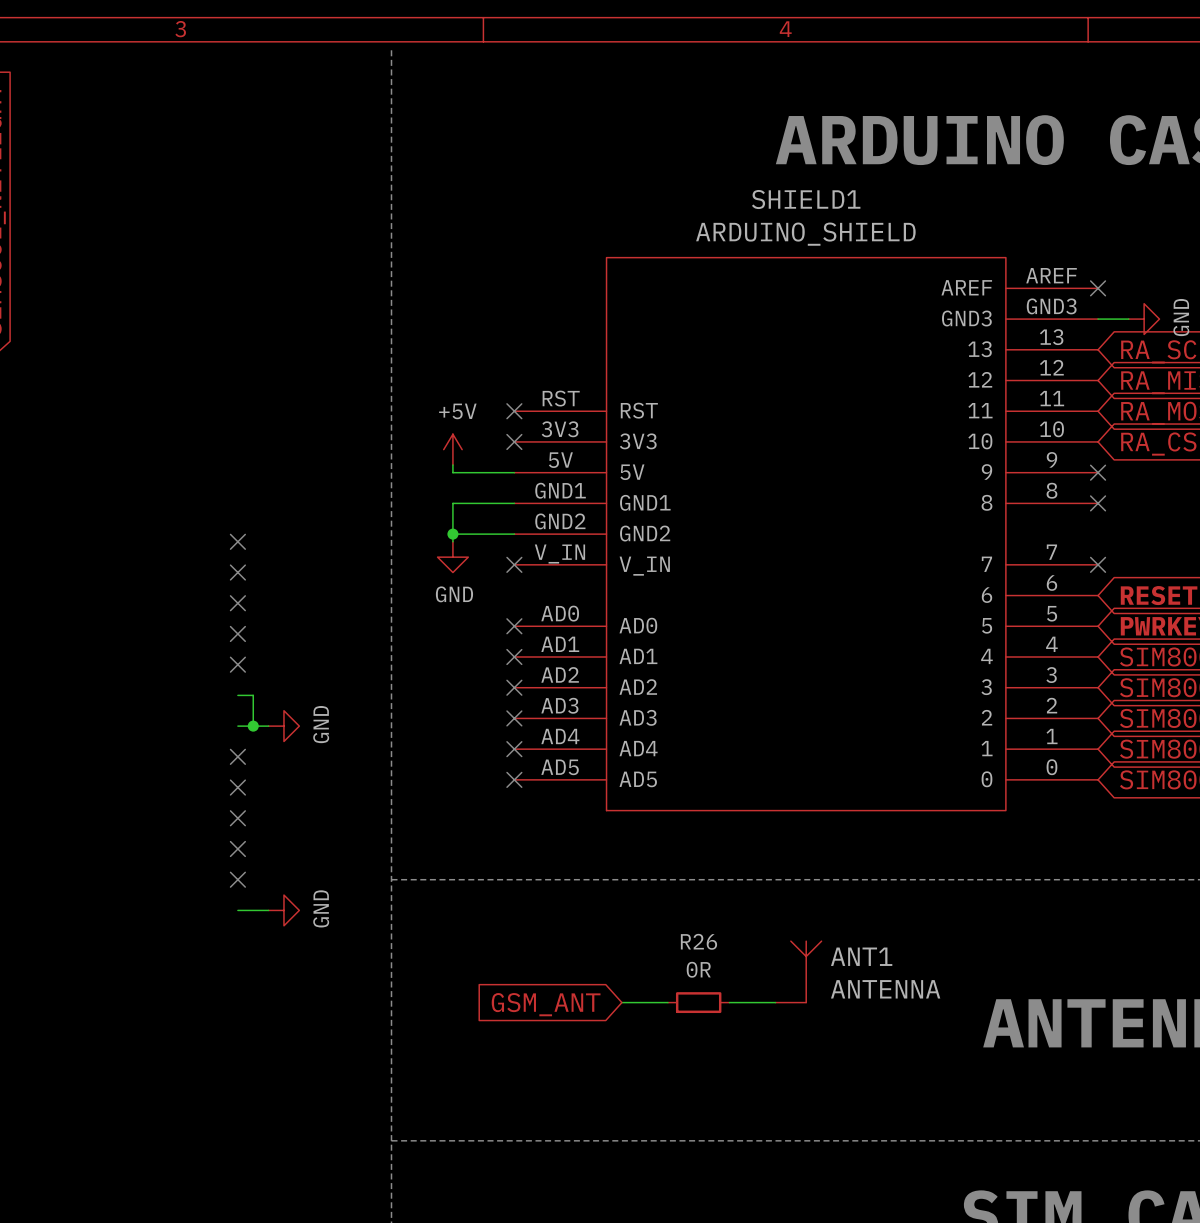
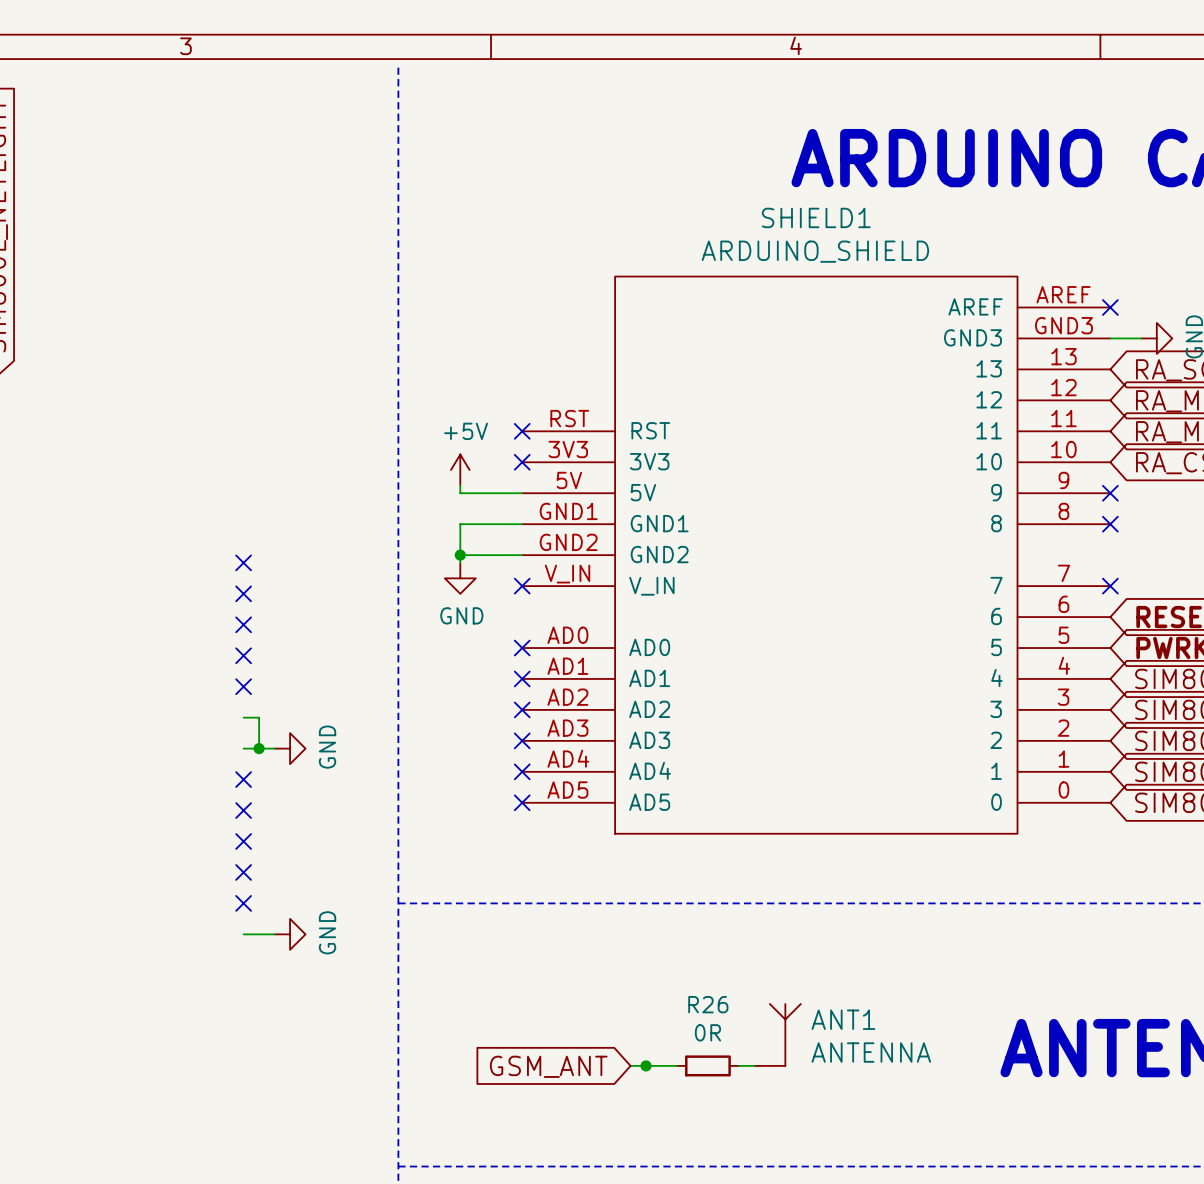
ANT1 position: (798, 971) -> (777, 1034)
wire: (621, 1002) (667, 1002) -> (630, 1065) (676, 1065)
R26 position: (698, 1002) -> (707, 1065)
wire: (729, 1002) (775, 1002) -> none
global label position: GSM_ANT (546, 1004) -> GSM_ANT (548, 1066)
junction: none -> (646, 1065)
wire: none -> (738, 1065) (754, 1065)

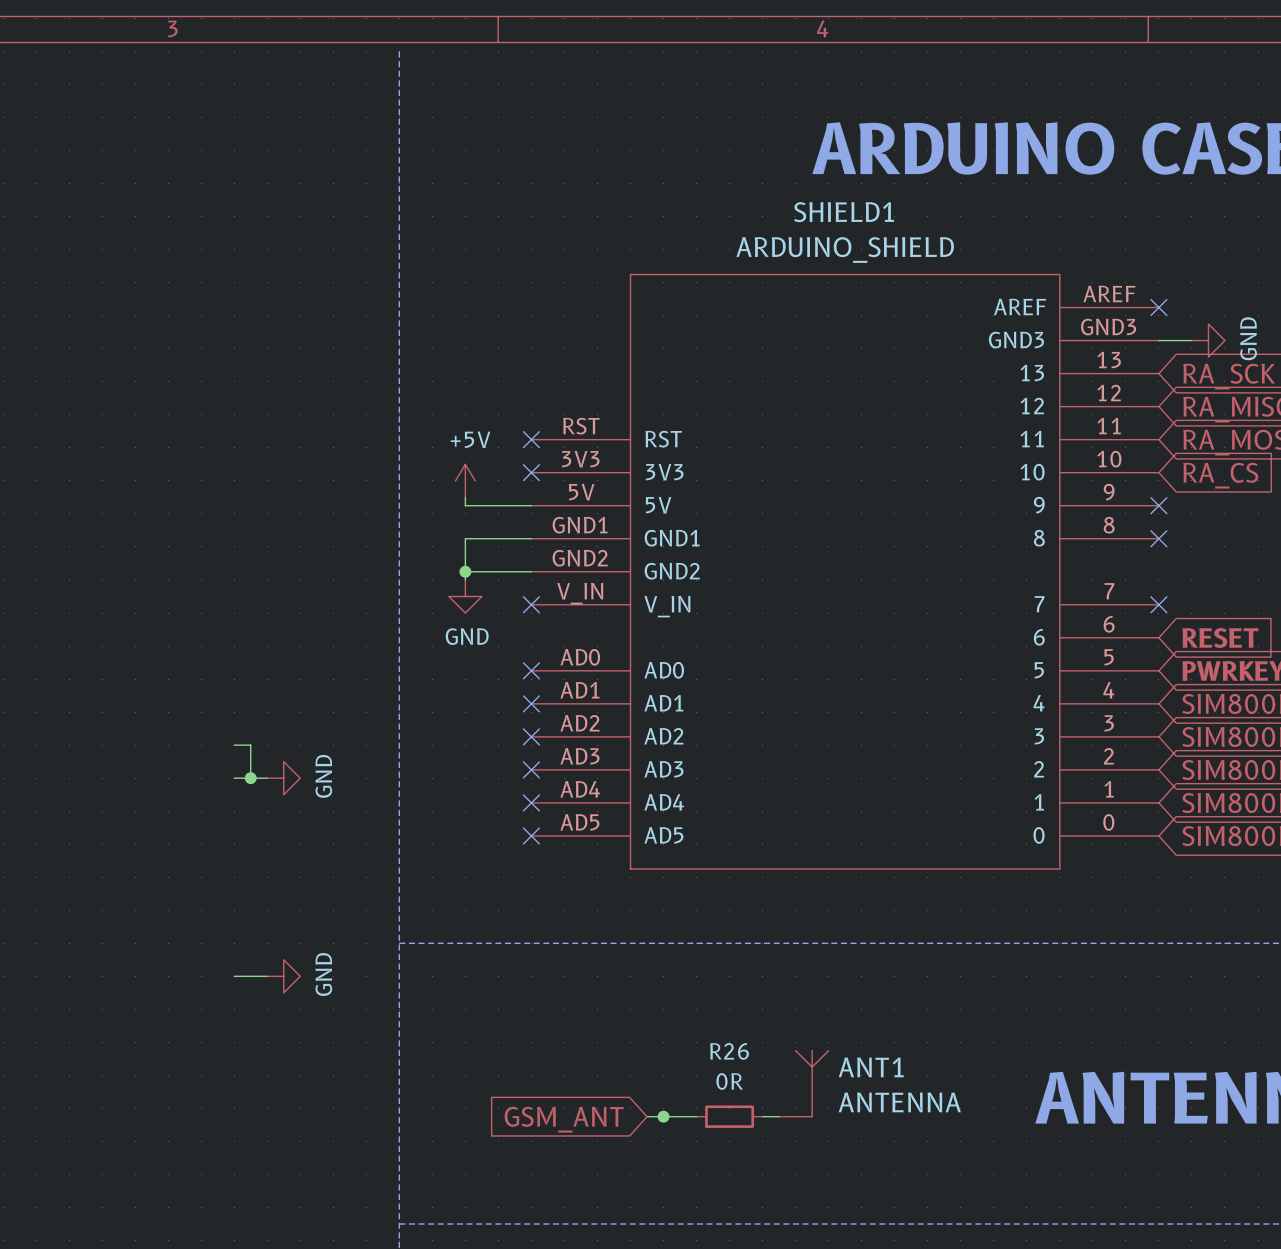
no-connect mark: (243, 562) -> none
no-connect mark: (243, 593) -> none
no-connect mark: (243, 624) -> none
no-connect mark: (243, 655) -> none
no-connect mark: (243, 686) -> none
no-connect mark: (243, 779) -> none
no-connect mark: (243, 810) -> none
no-connect mark: (243, 841) -> none
no-connect mark: (243, 872) -> none
no-connect mark: (243, 903) -> none

